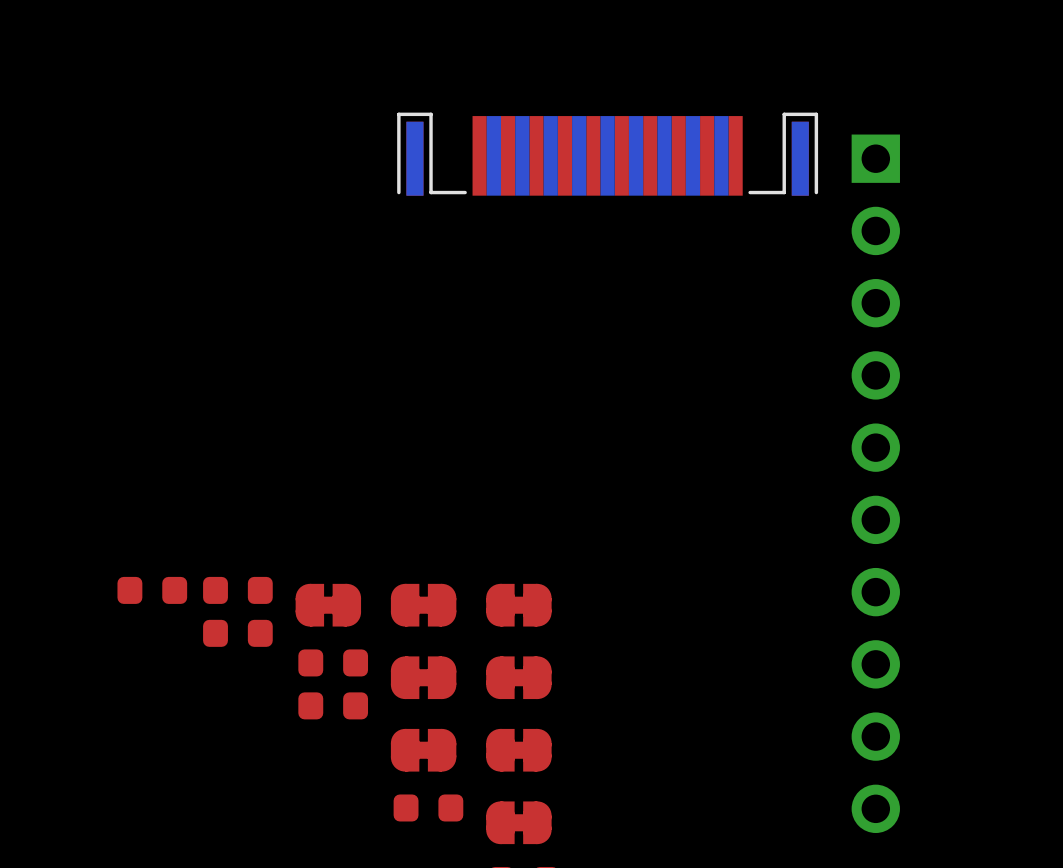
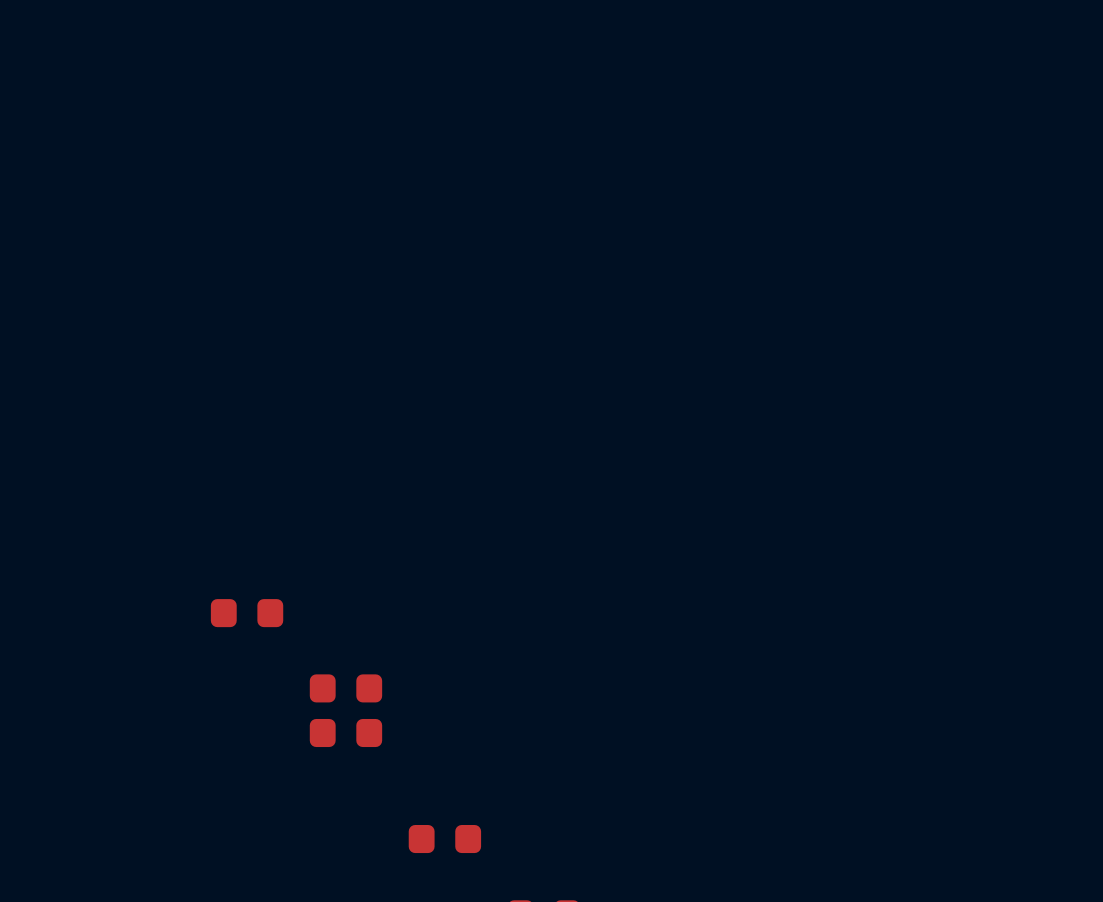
part: (607, 154) -> none
part: (875, 483) -> none
part: (152, 590) -> none
part: (328, 605) -> none
part: (423, 605) -> none
part: (518, 605) -> none
part: (237, 633) -> none
part: (423, 677) -> none
part: (518, 677) -> none
part: (423, 750) -> none
part: (518, 750) -> none
part: (518, 822) -> none

